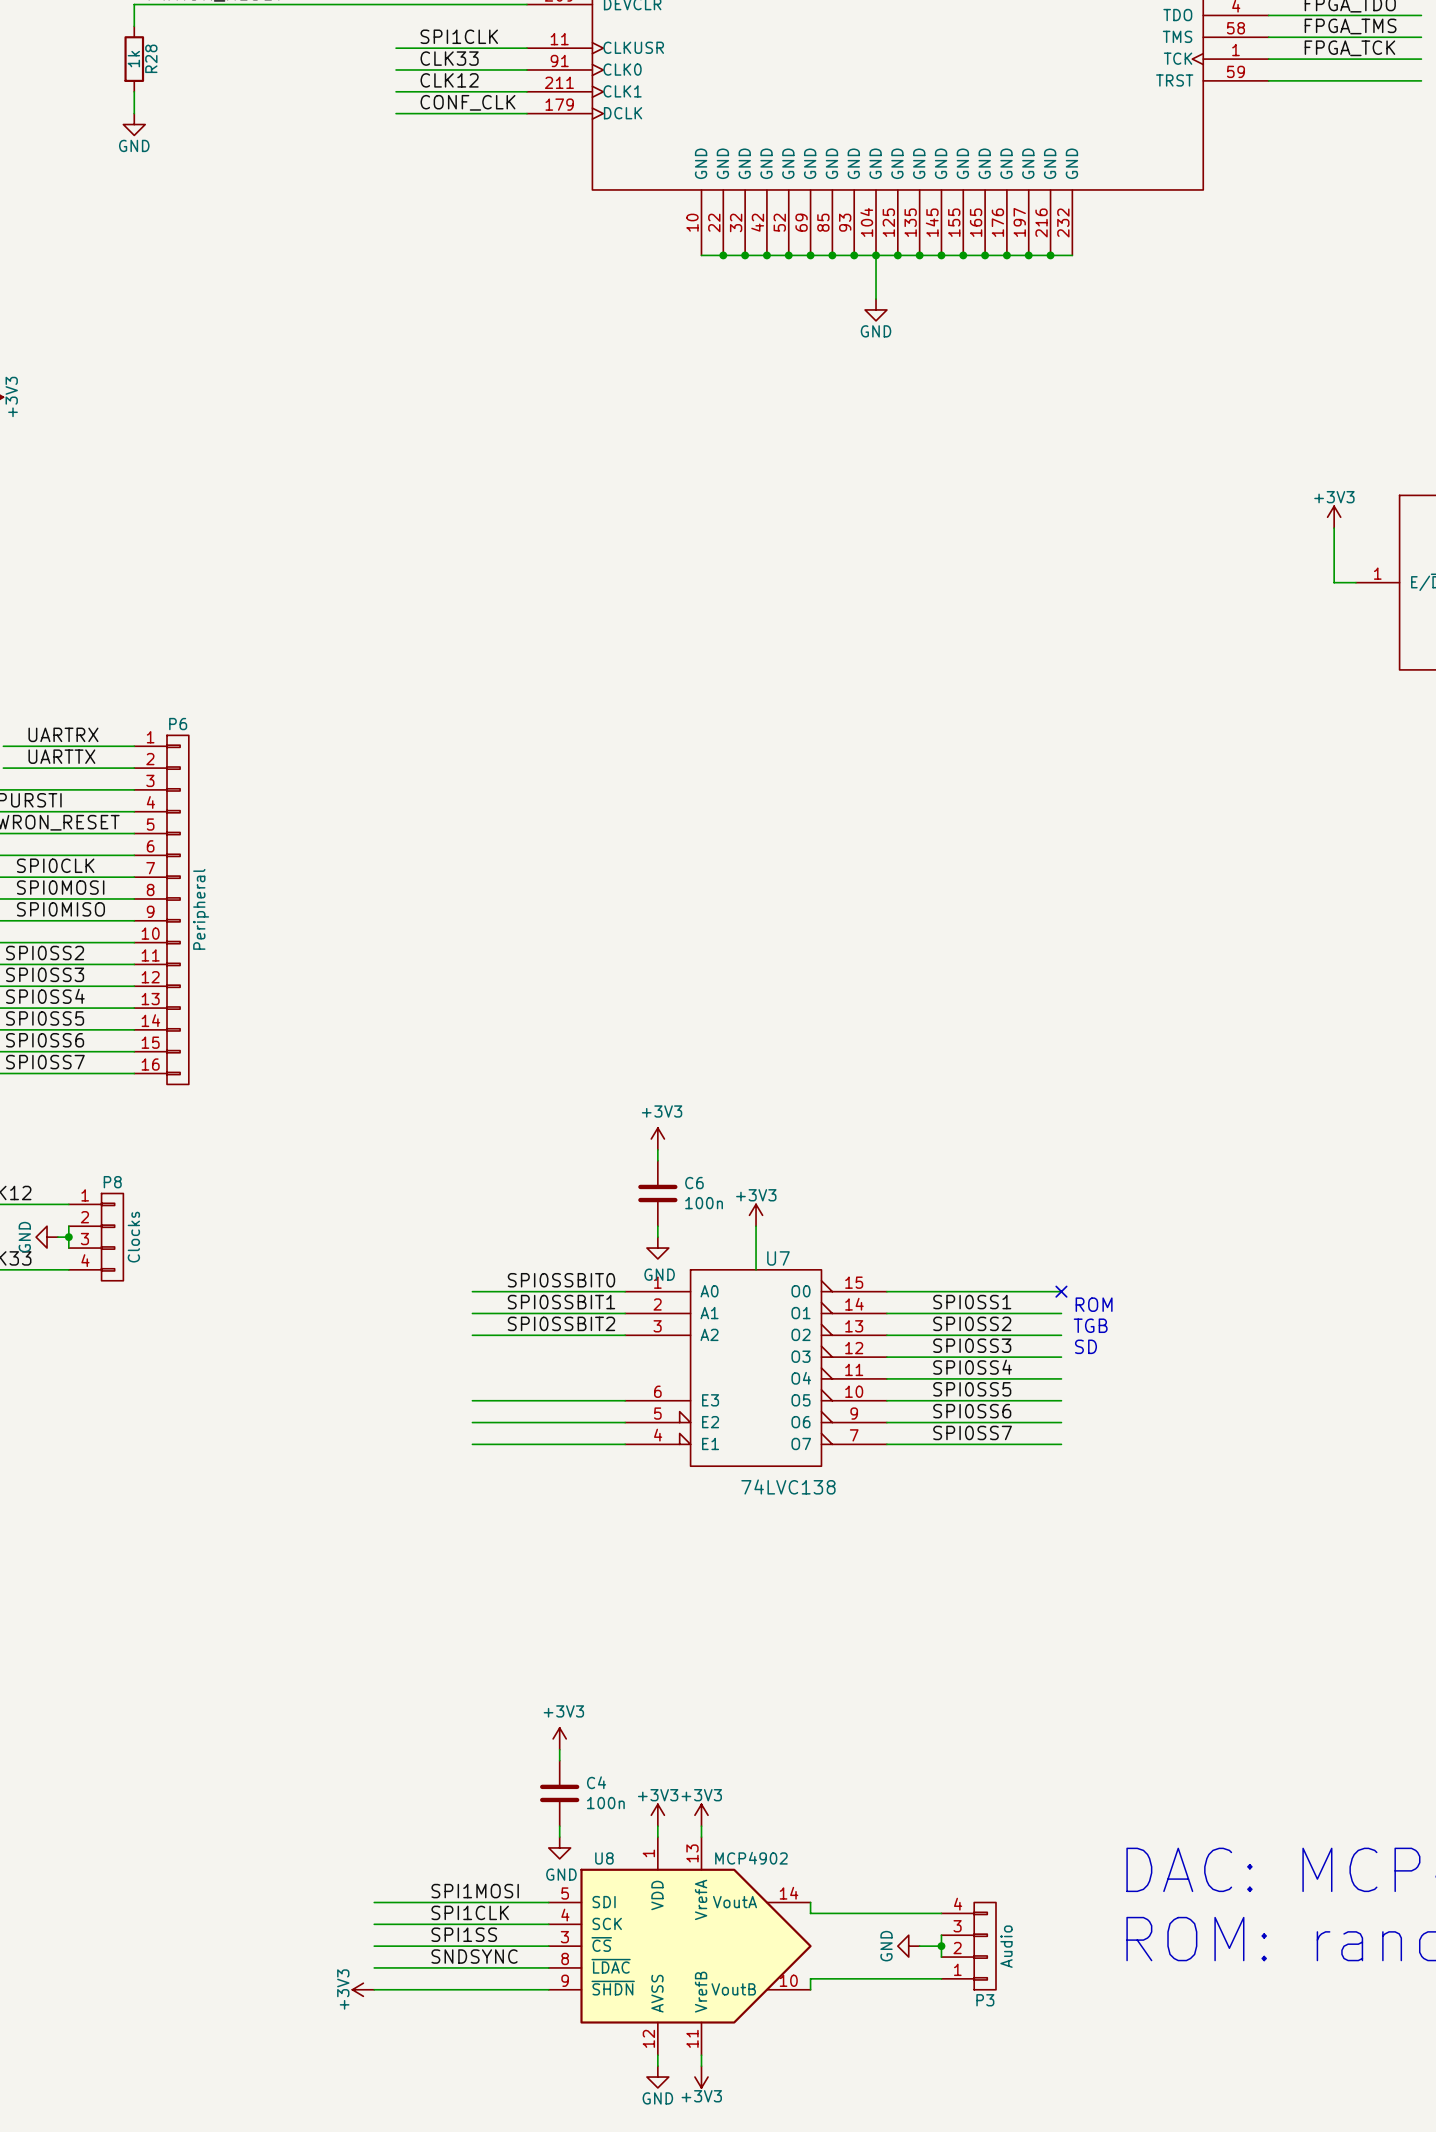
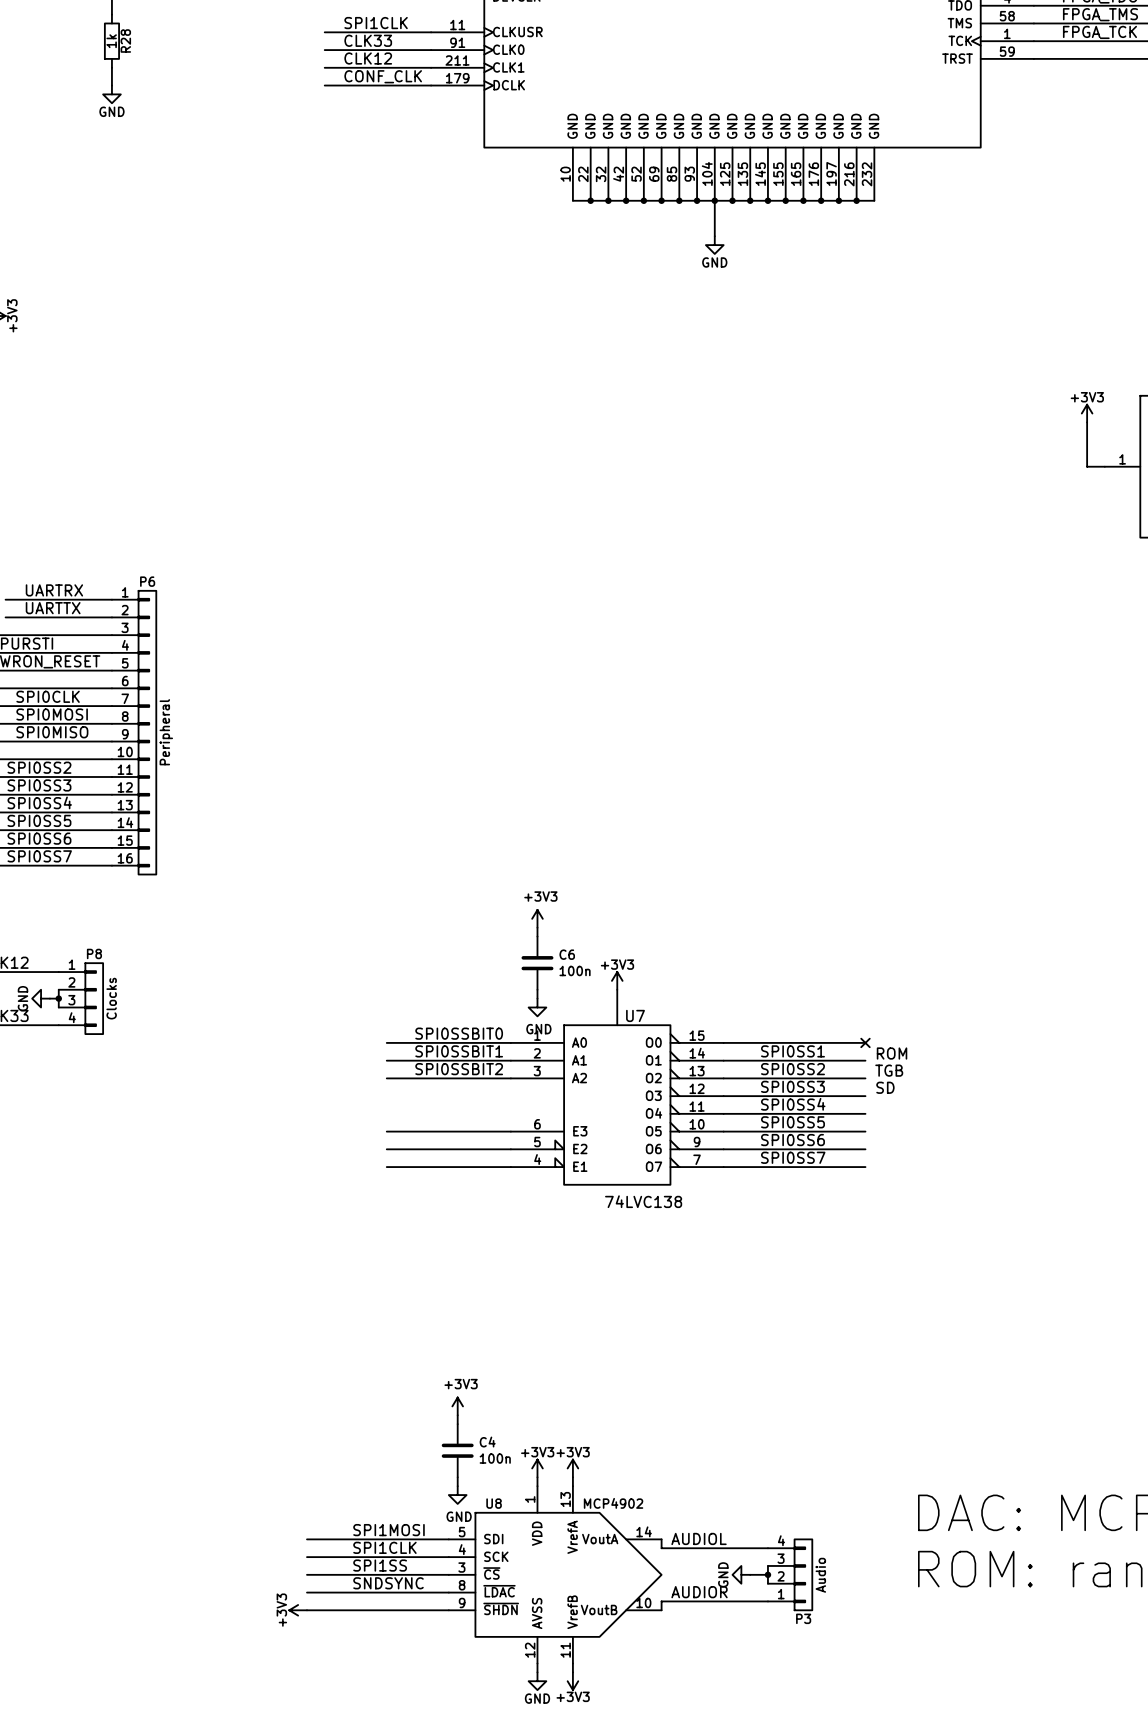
label: none -> AUDIOL (699, 1538)
label: none -> AUDIOR (699, 1592)

